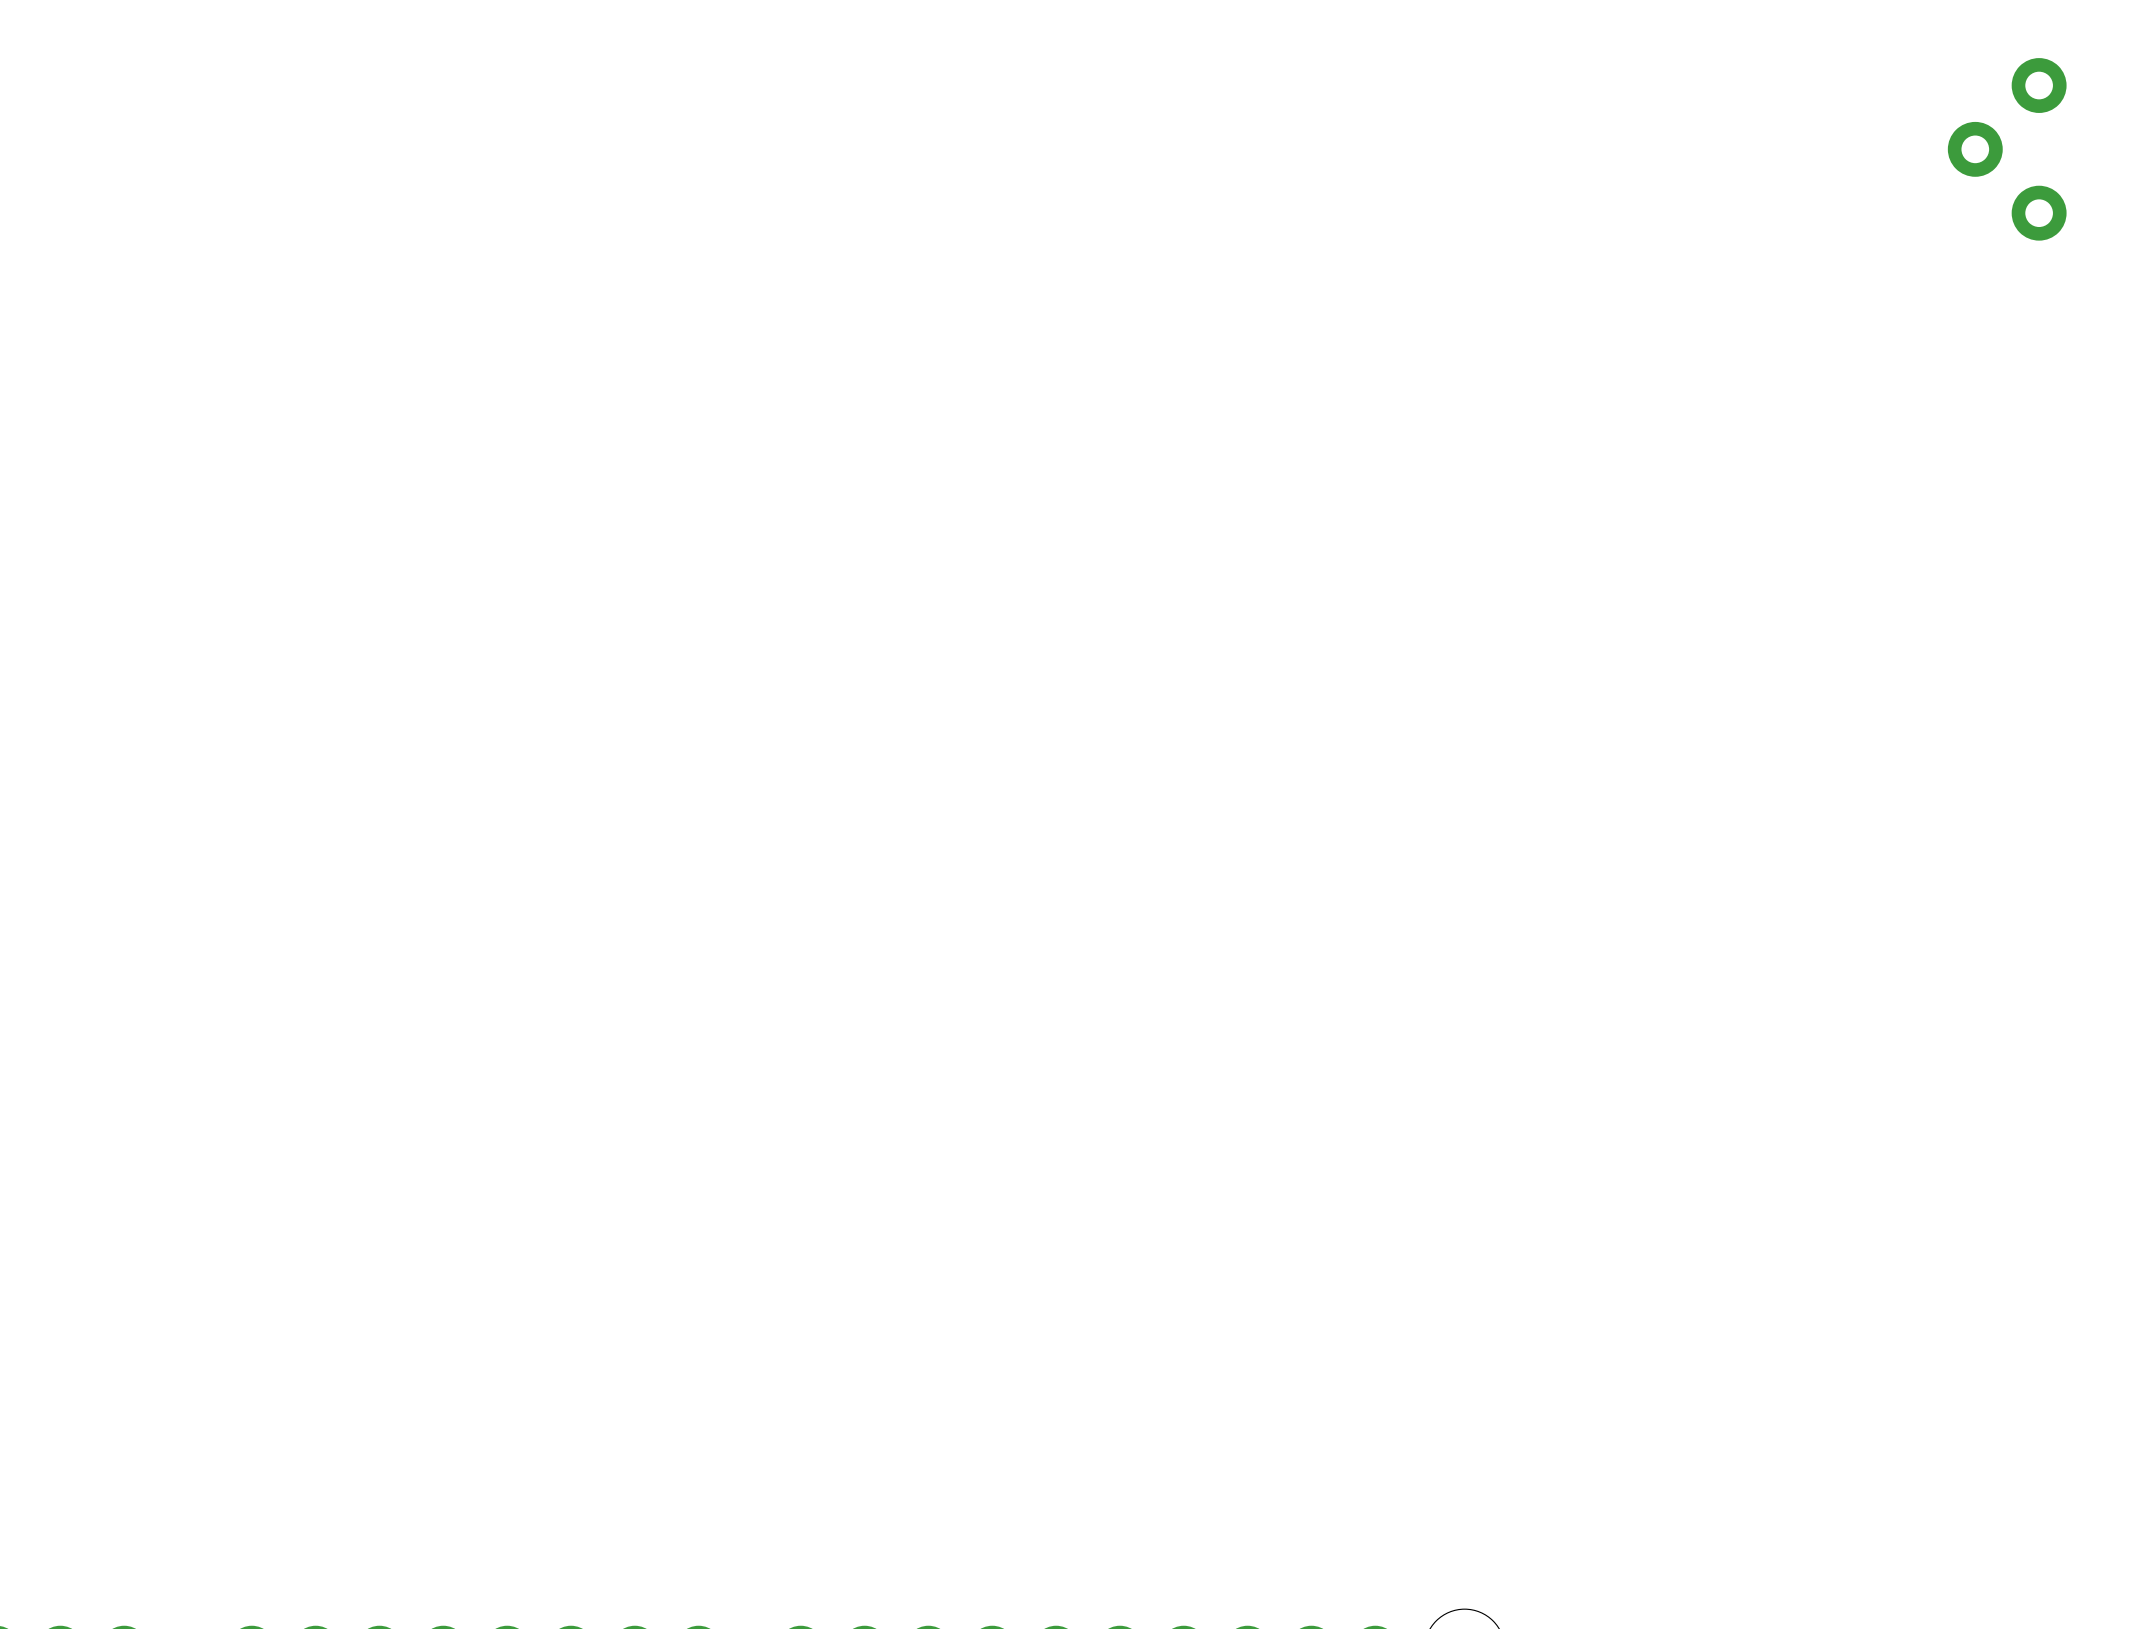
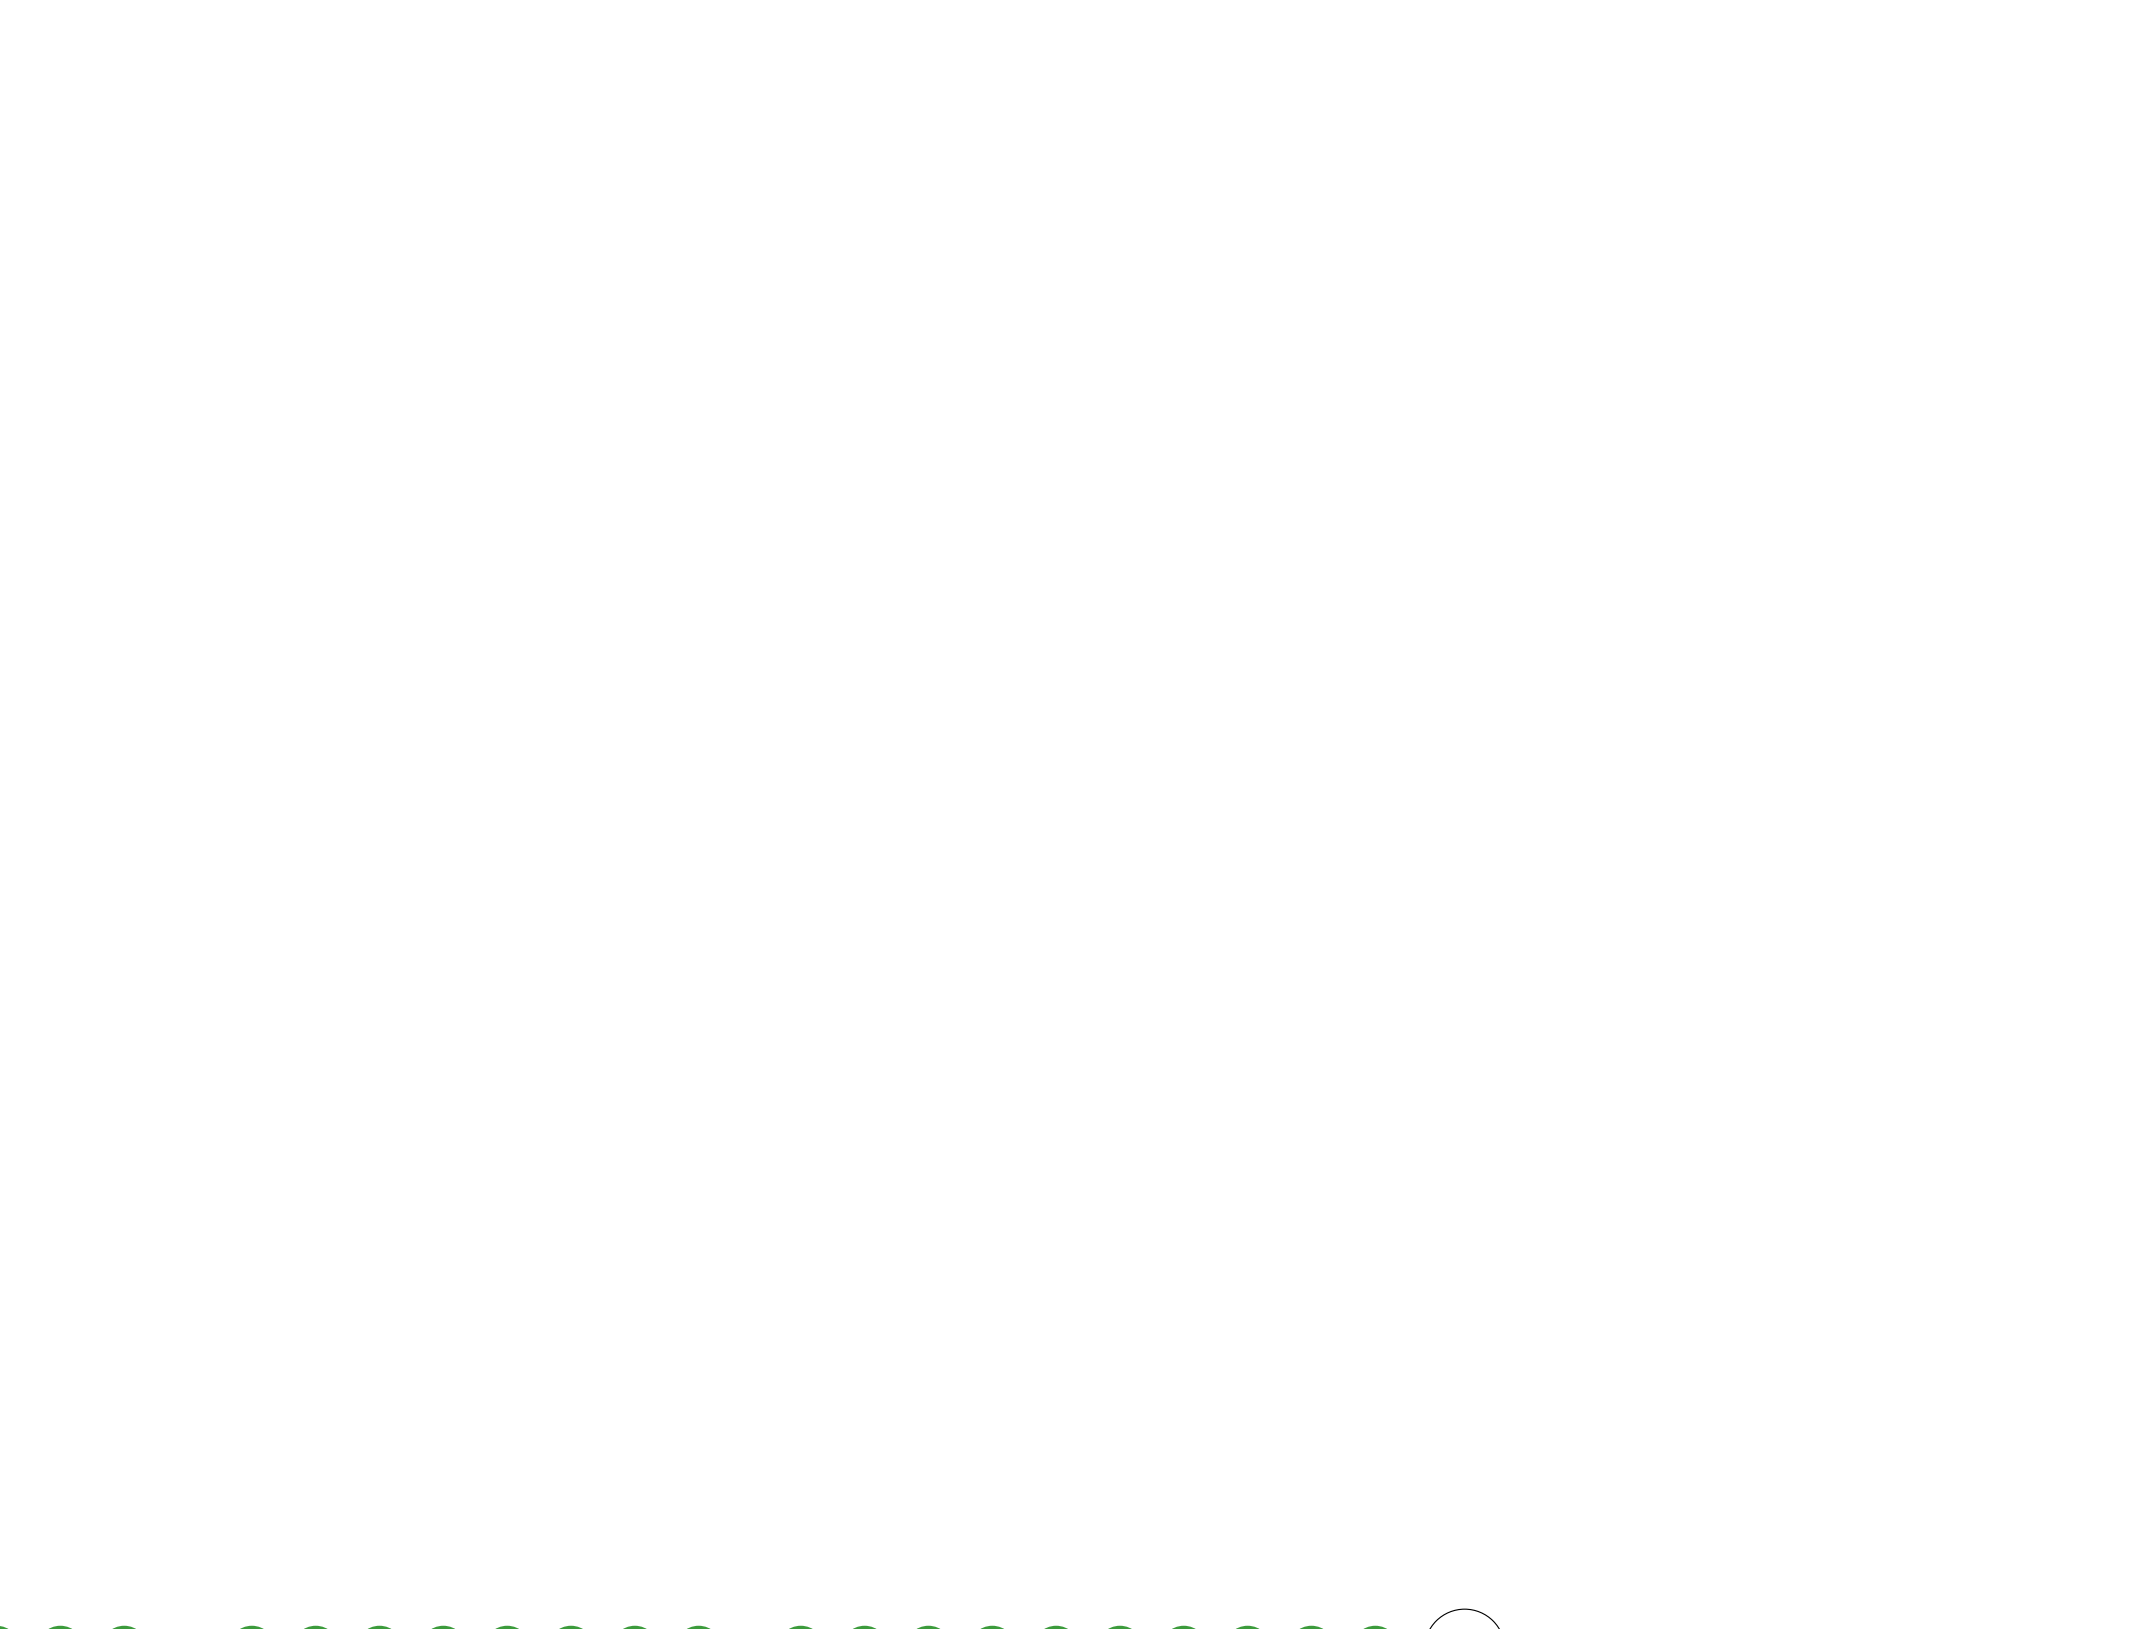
part: (2007, 149) -> none

